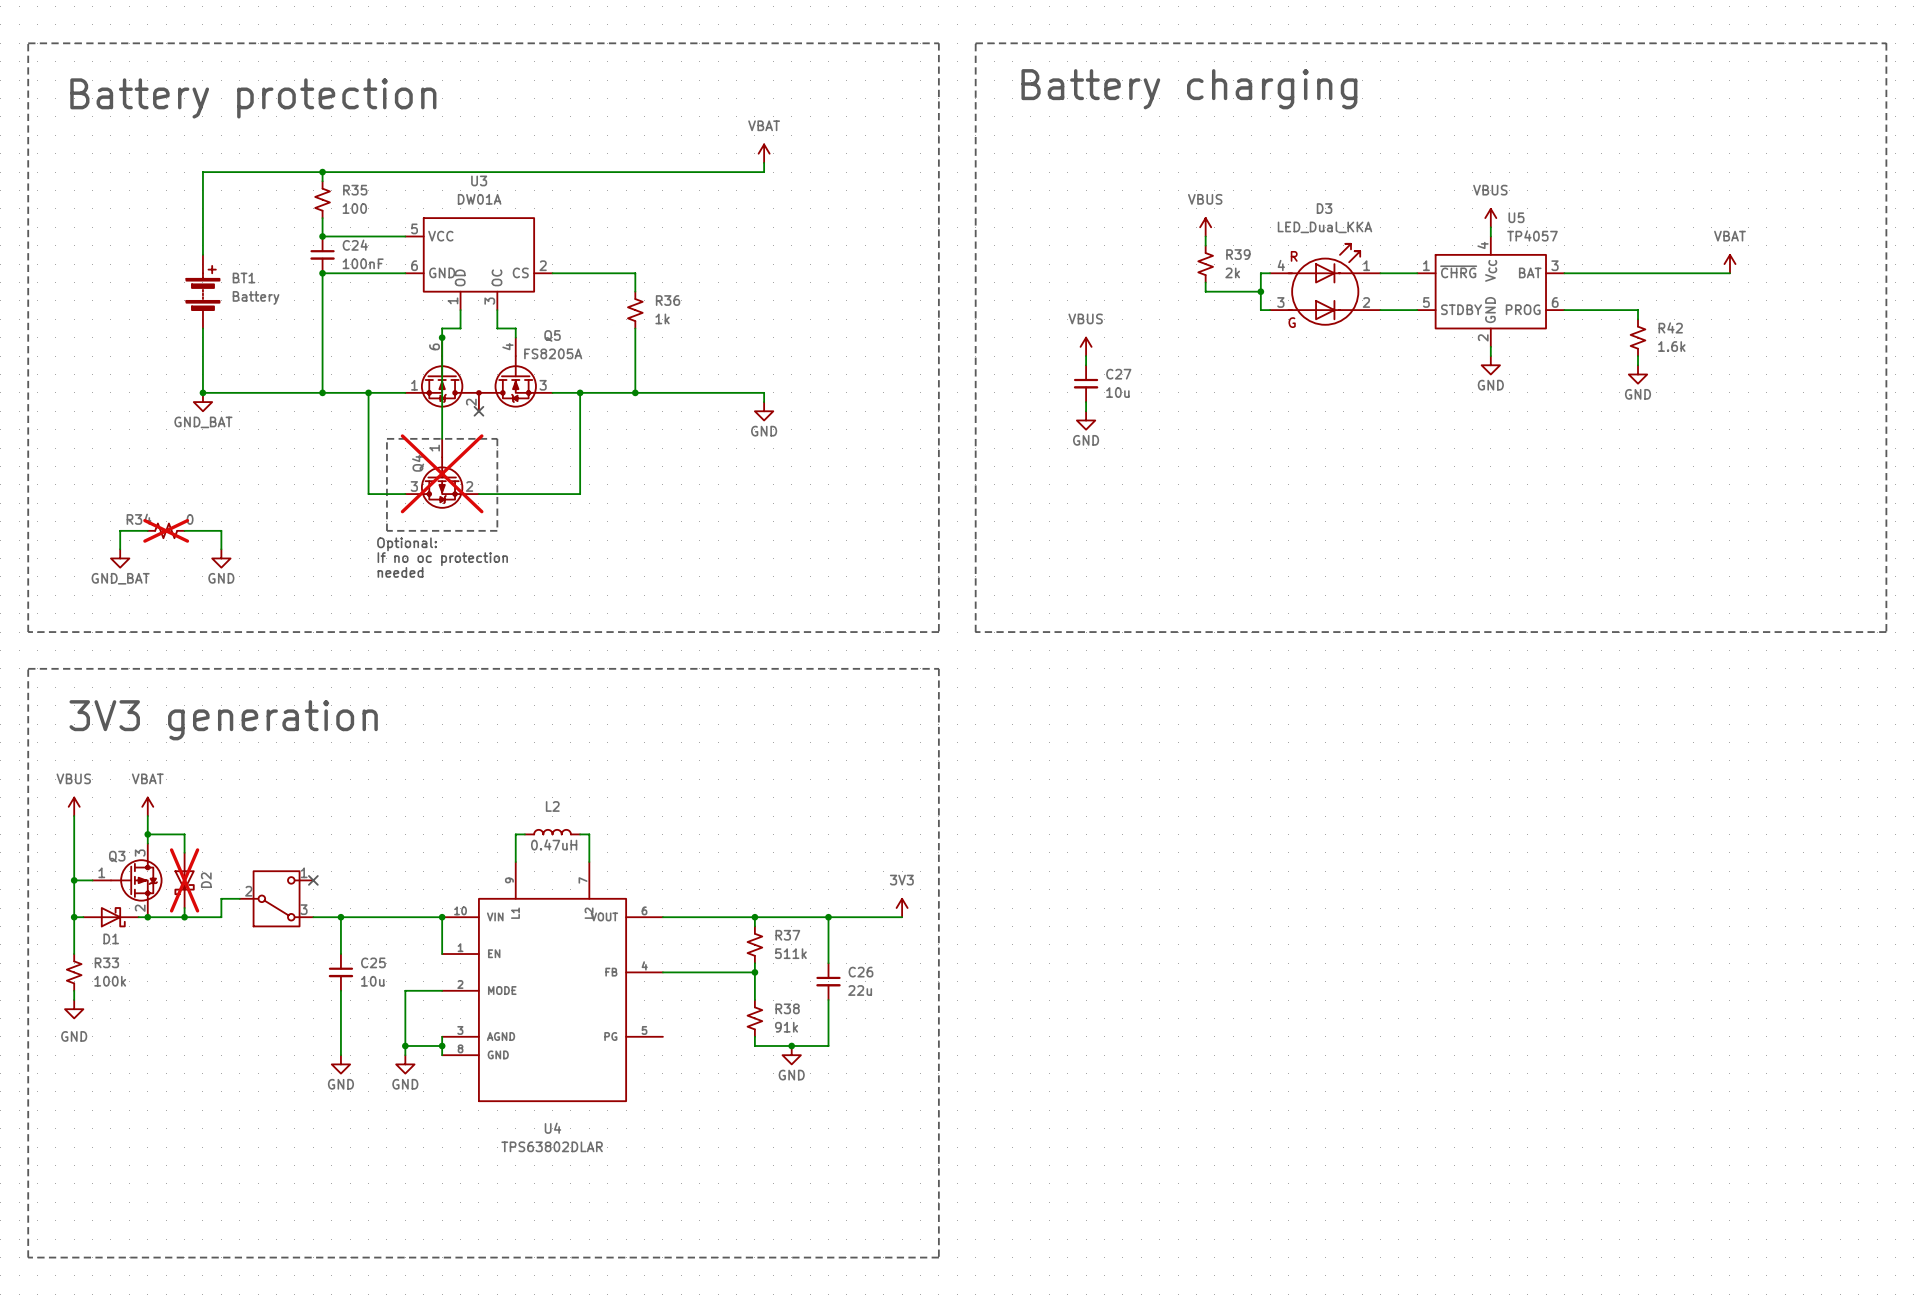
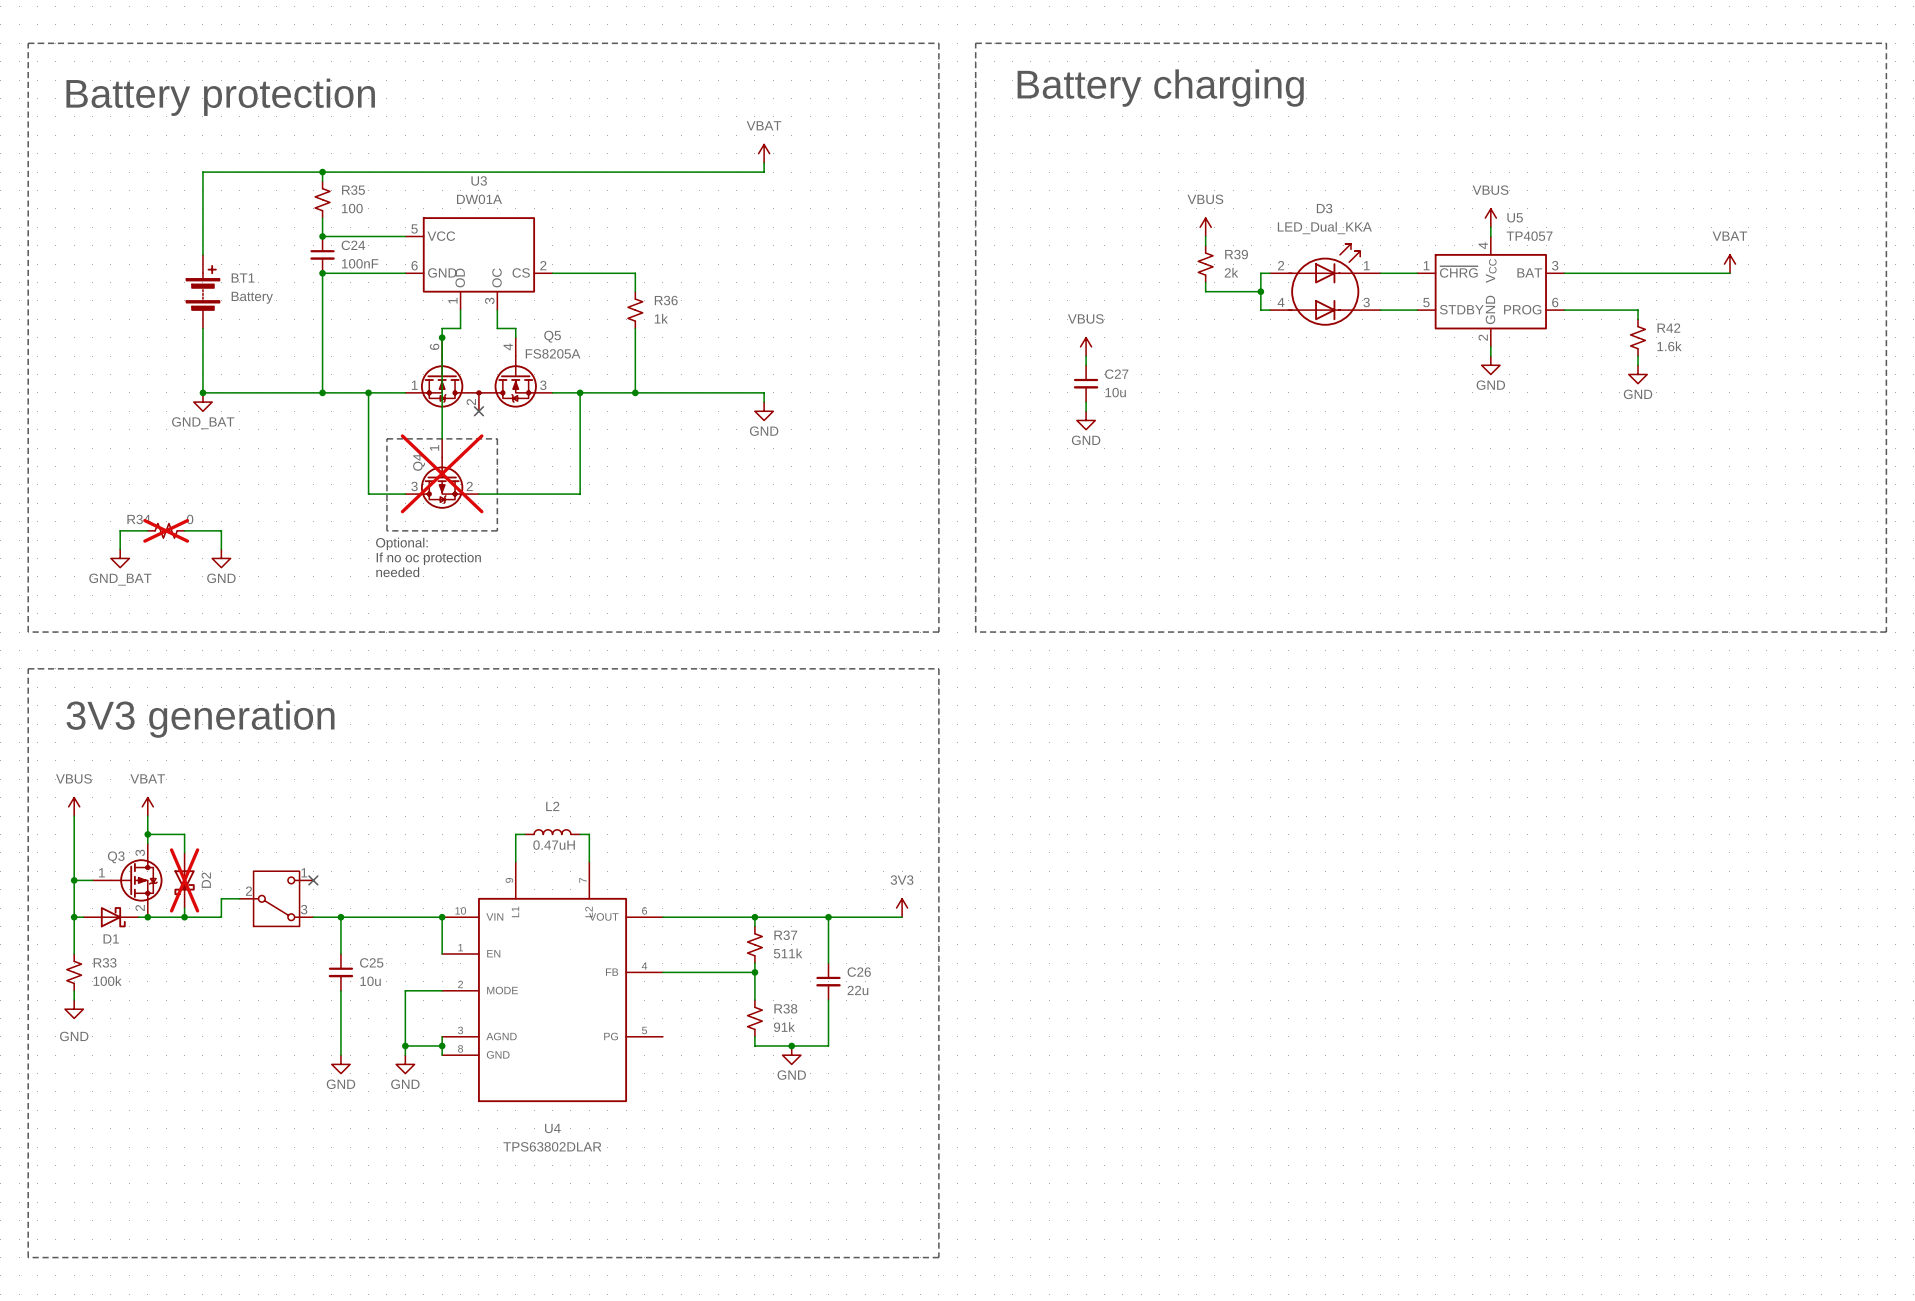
D3 text: R (1294, 256) -> none
D3 pin number: 4 (1281, 265) -> 2 (1281, 265)
D3 pin number: 3 (1280, 302) -> 4 (1281, 302)
D3 pin number: 2 (1366, 302) -> 3 (1366, 302)
D3 text: G (1292, 322) -> none

